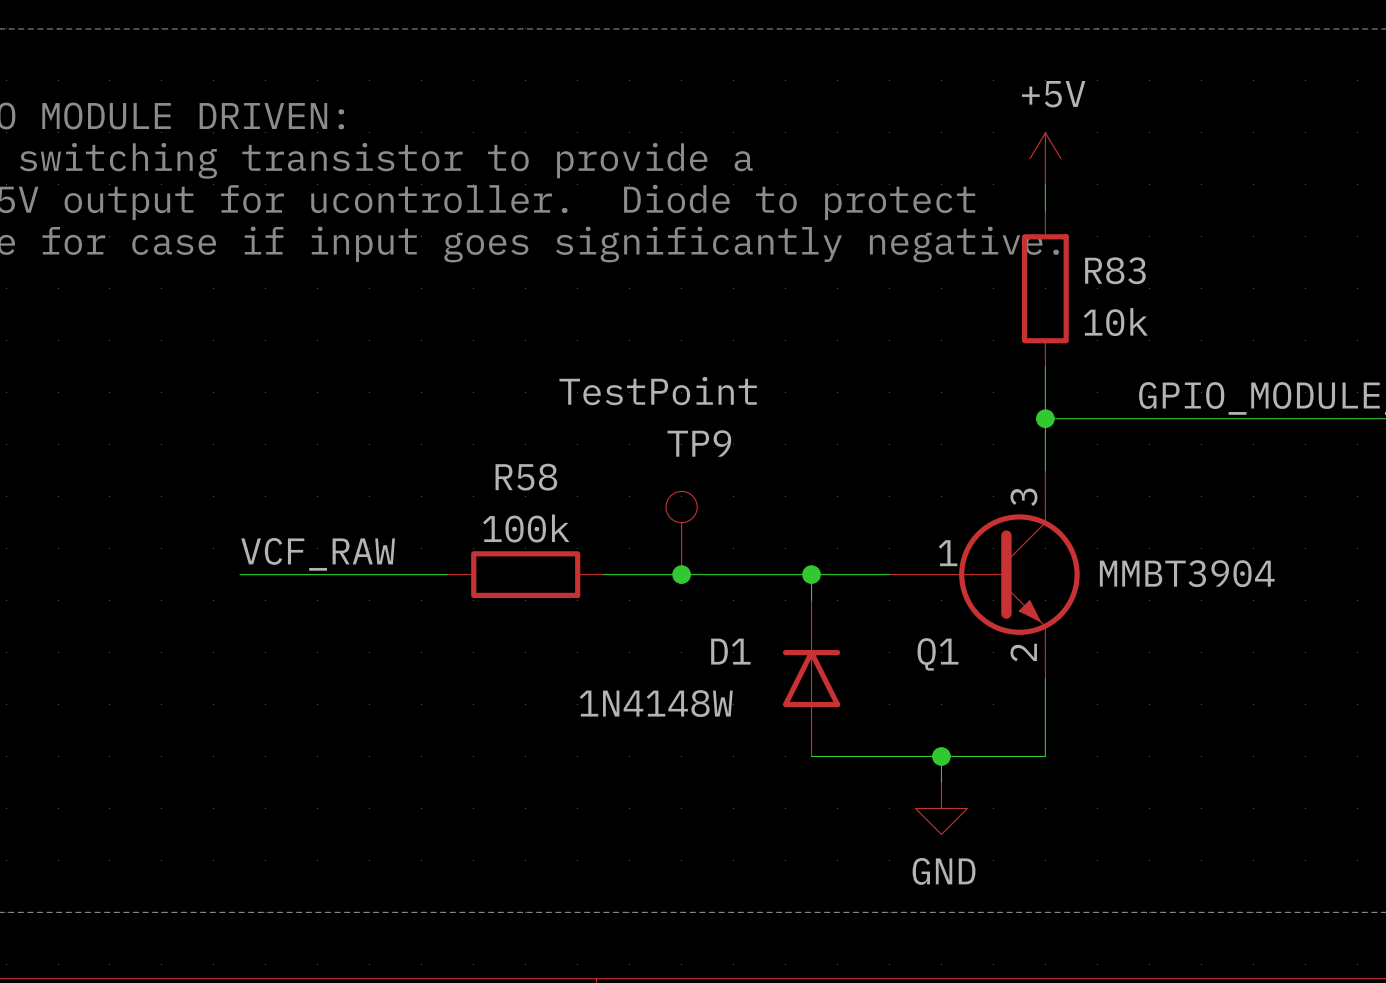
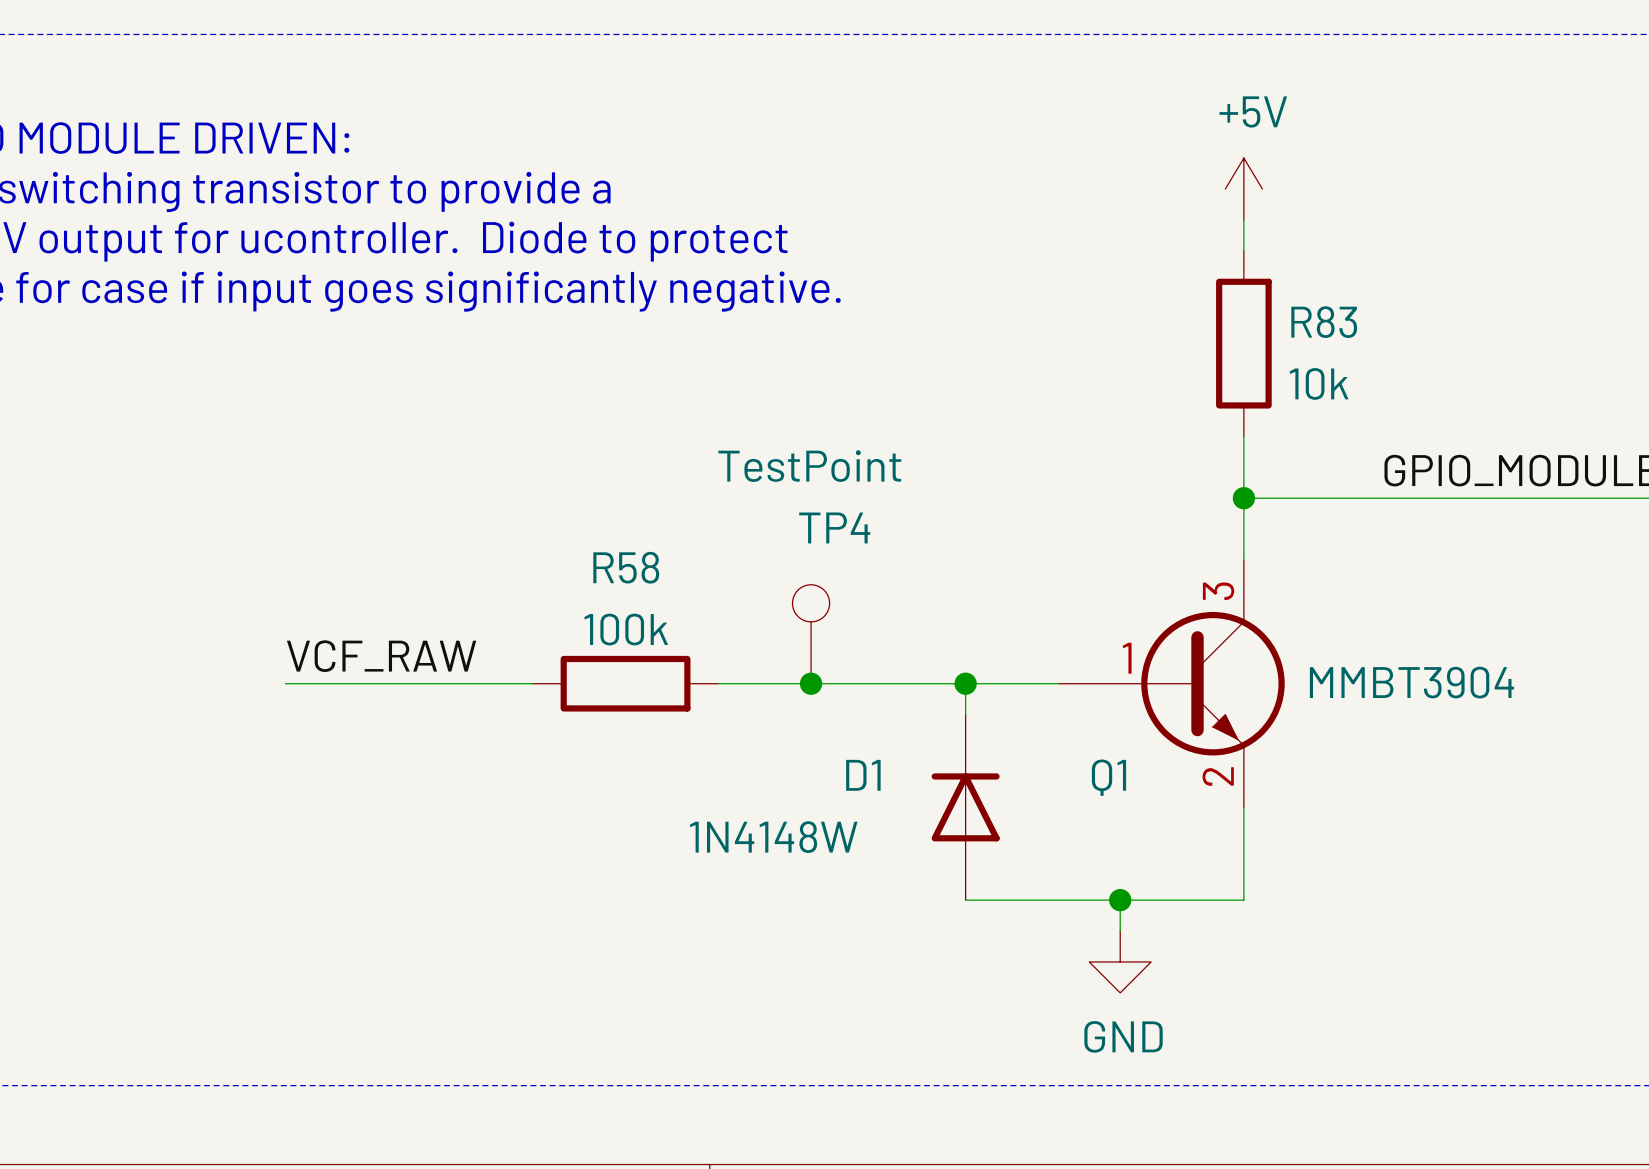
TP9 name: TP9 (699, 443) -> TP4 (834, 527)

